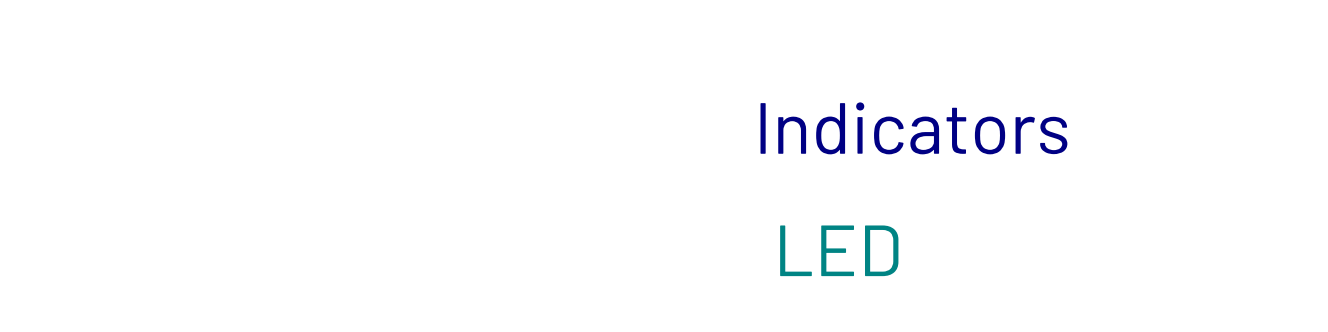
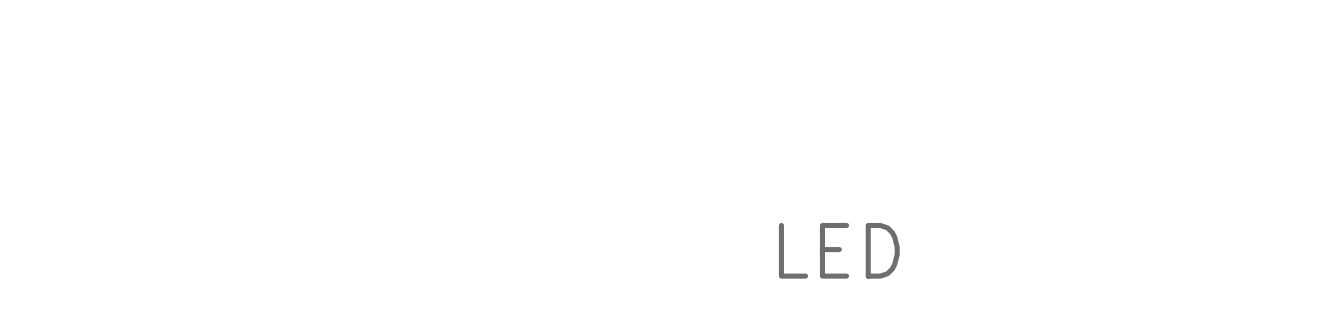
text: Indicators (913, 128) -> none

